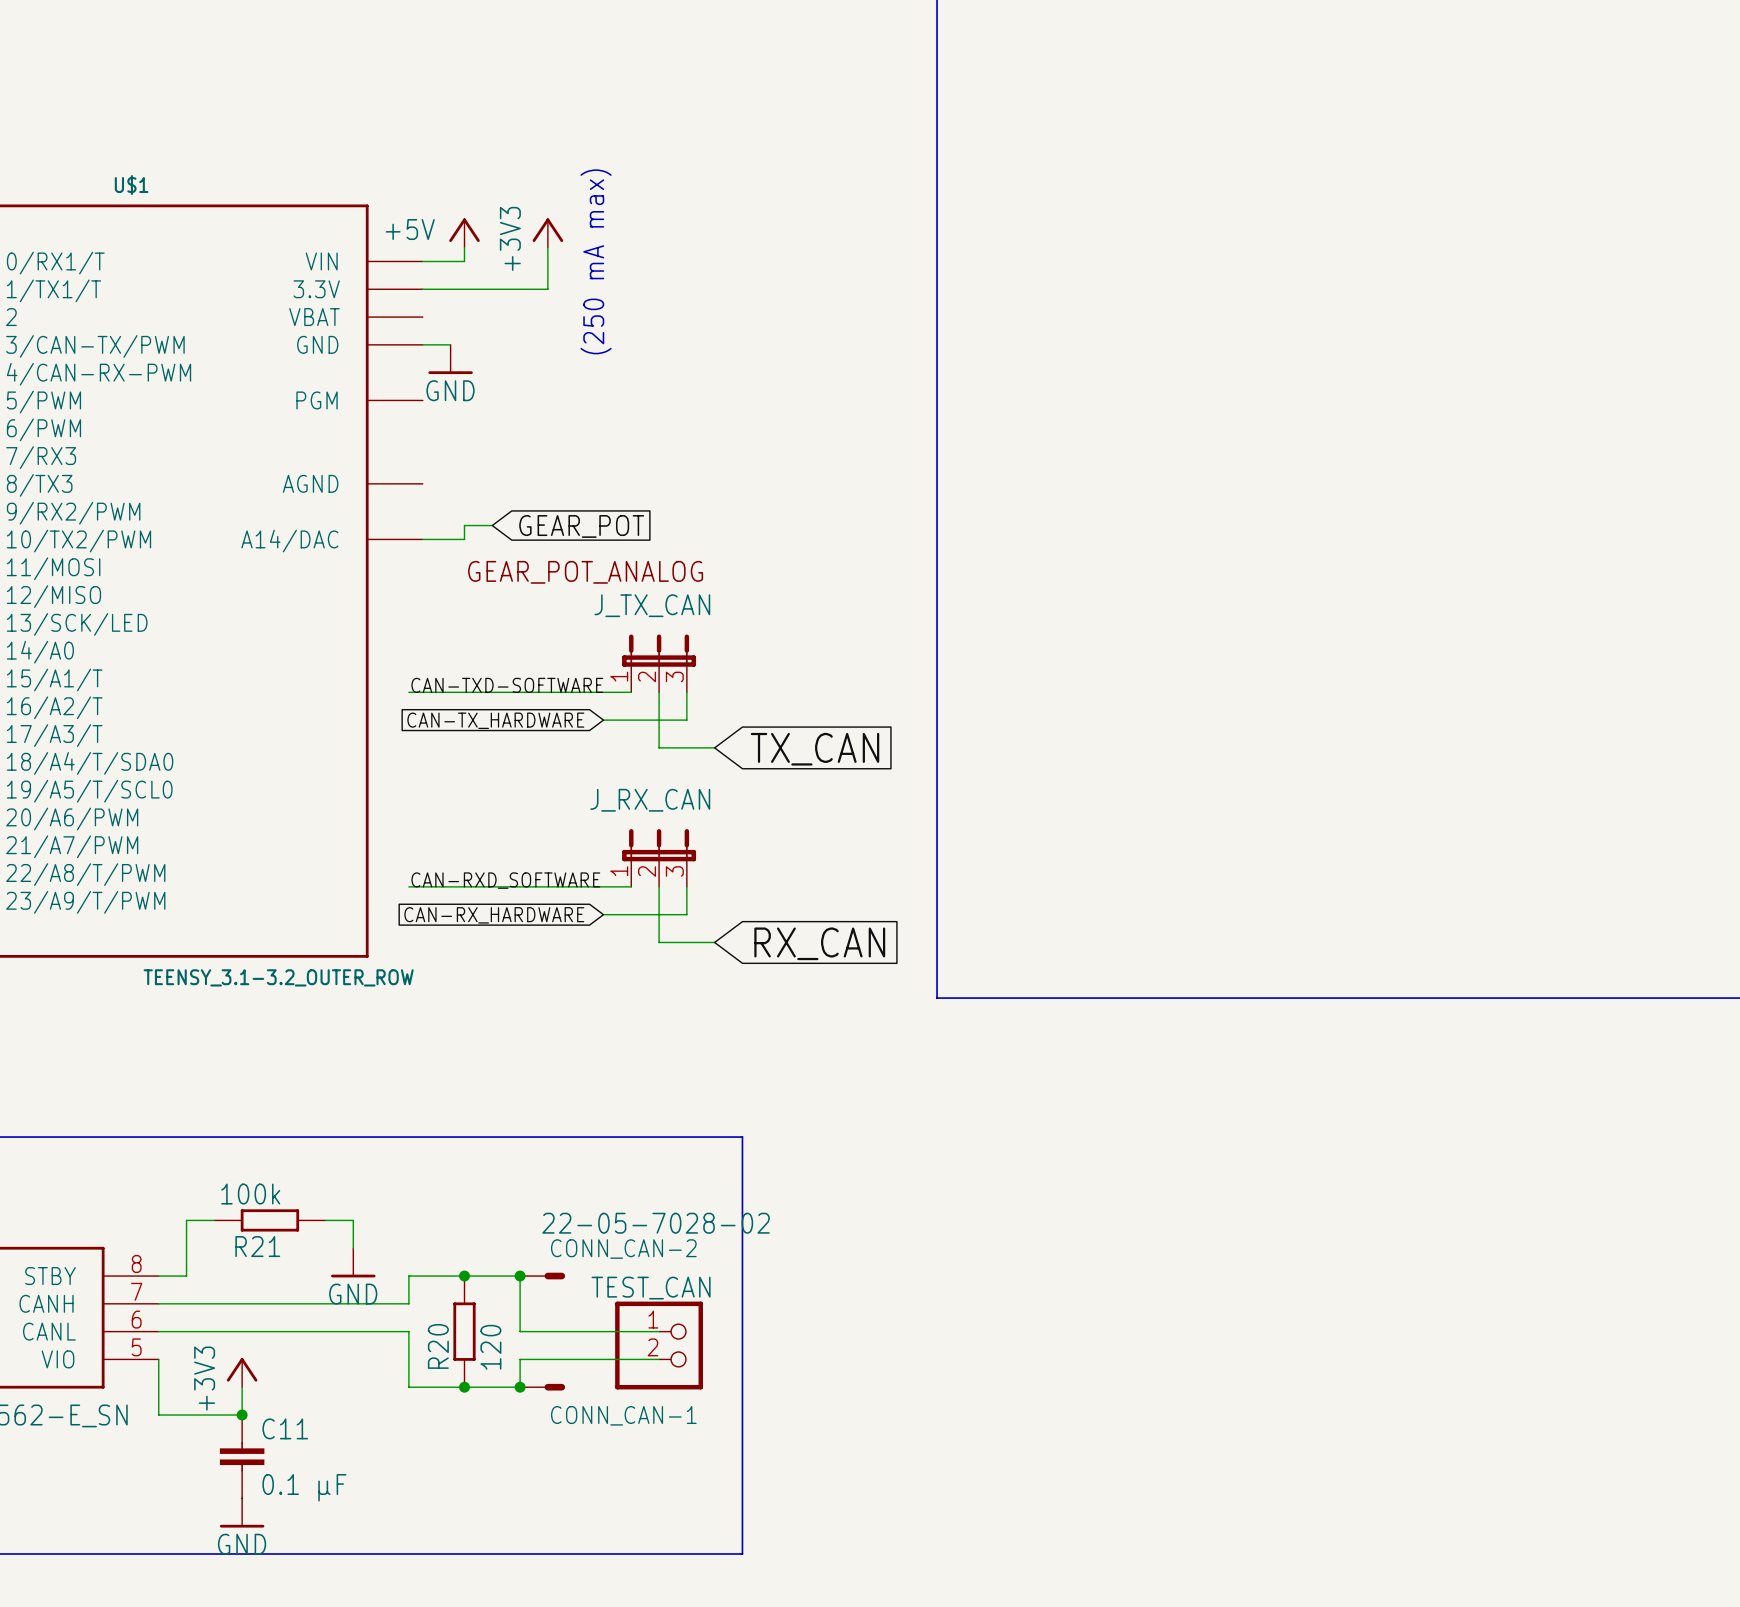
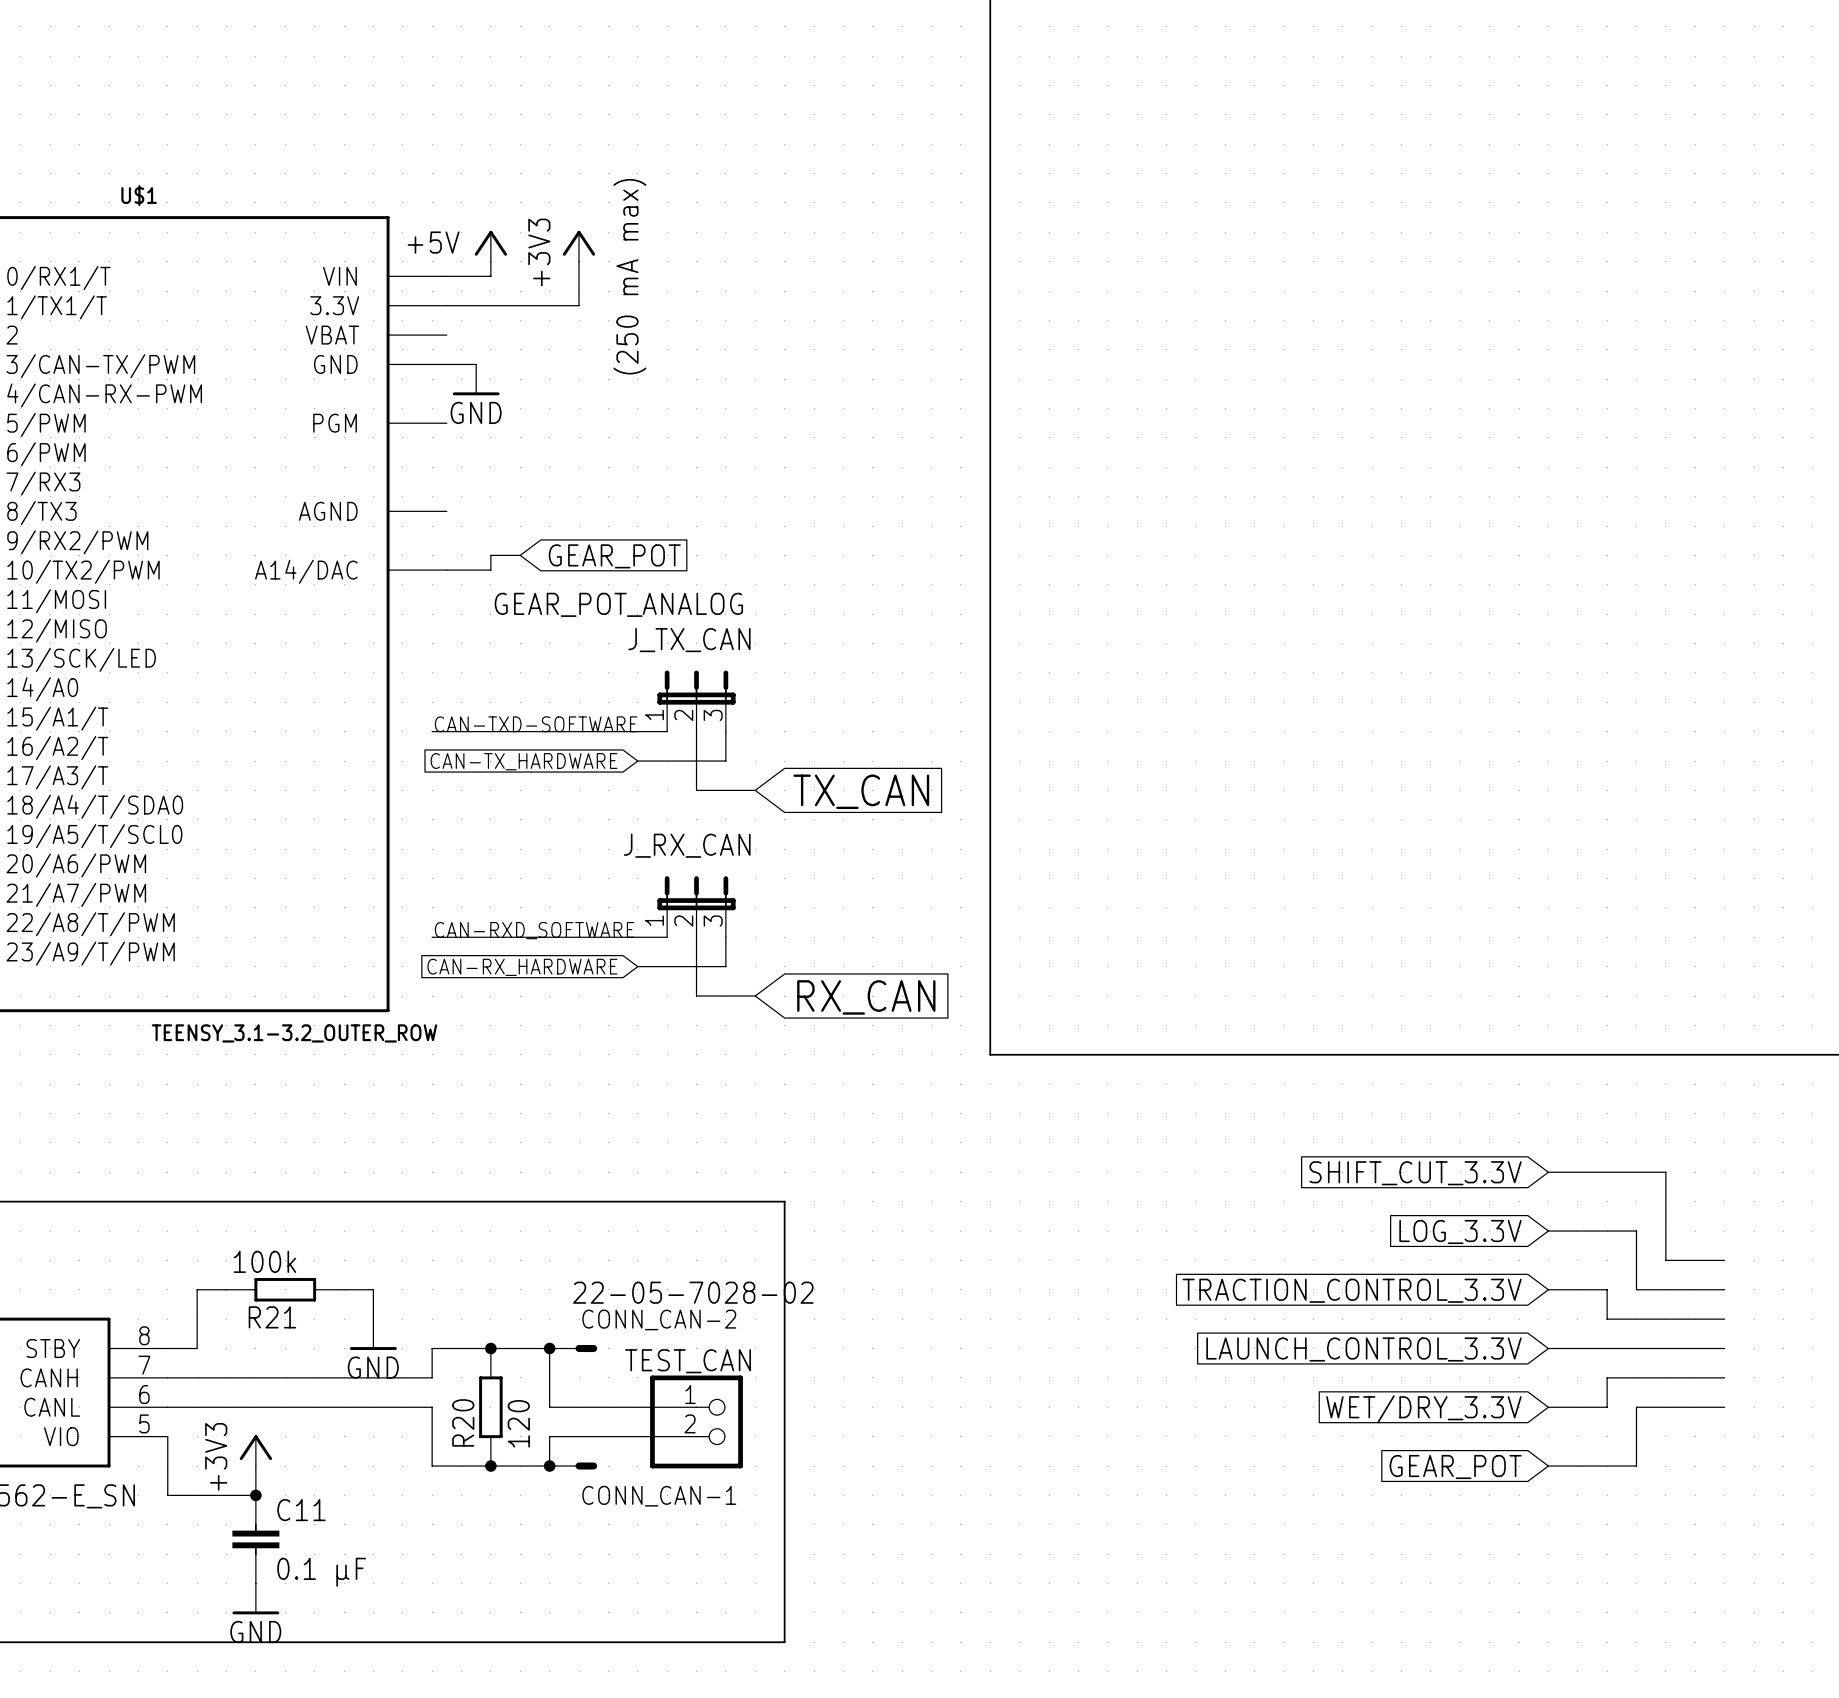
wire: none -> (1548, 1172) (1665, 1172) (1665, 1260) (1724, 1260)
global label: none -> SHIFT_CUT_3.3V (1415, 1173)
wire: none -> (1548, 1231) (1636, 1231) (1636, 1289) (1724, 1289)
global label: none -> LOG_3.3V (1460, 1231)
wire: none -> (1548, 1289) (1607, 1289) (1607, 1319) (1724, 1319)
global label: none -> TRACTION_CONTROL_3.3V (1352, 1290)
global label: none -> LAUNCH_CONTROL_3.3V (1363, 1349)
wire: none -> (1548, 1348) (1724, 1348)
wire: none -> (1724, 1377) (1607, 1377) (1607, 1407) (1548, 1407)
wire: none -> (1724, 1407) (1636, 1407) (1636, 1466) (1548, 1466)
global label: none -> WET/DRY_3.3V (1423, 1409)
global label: none -> GEAR_POT (1455, 1466)

